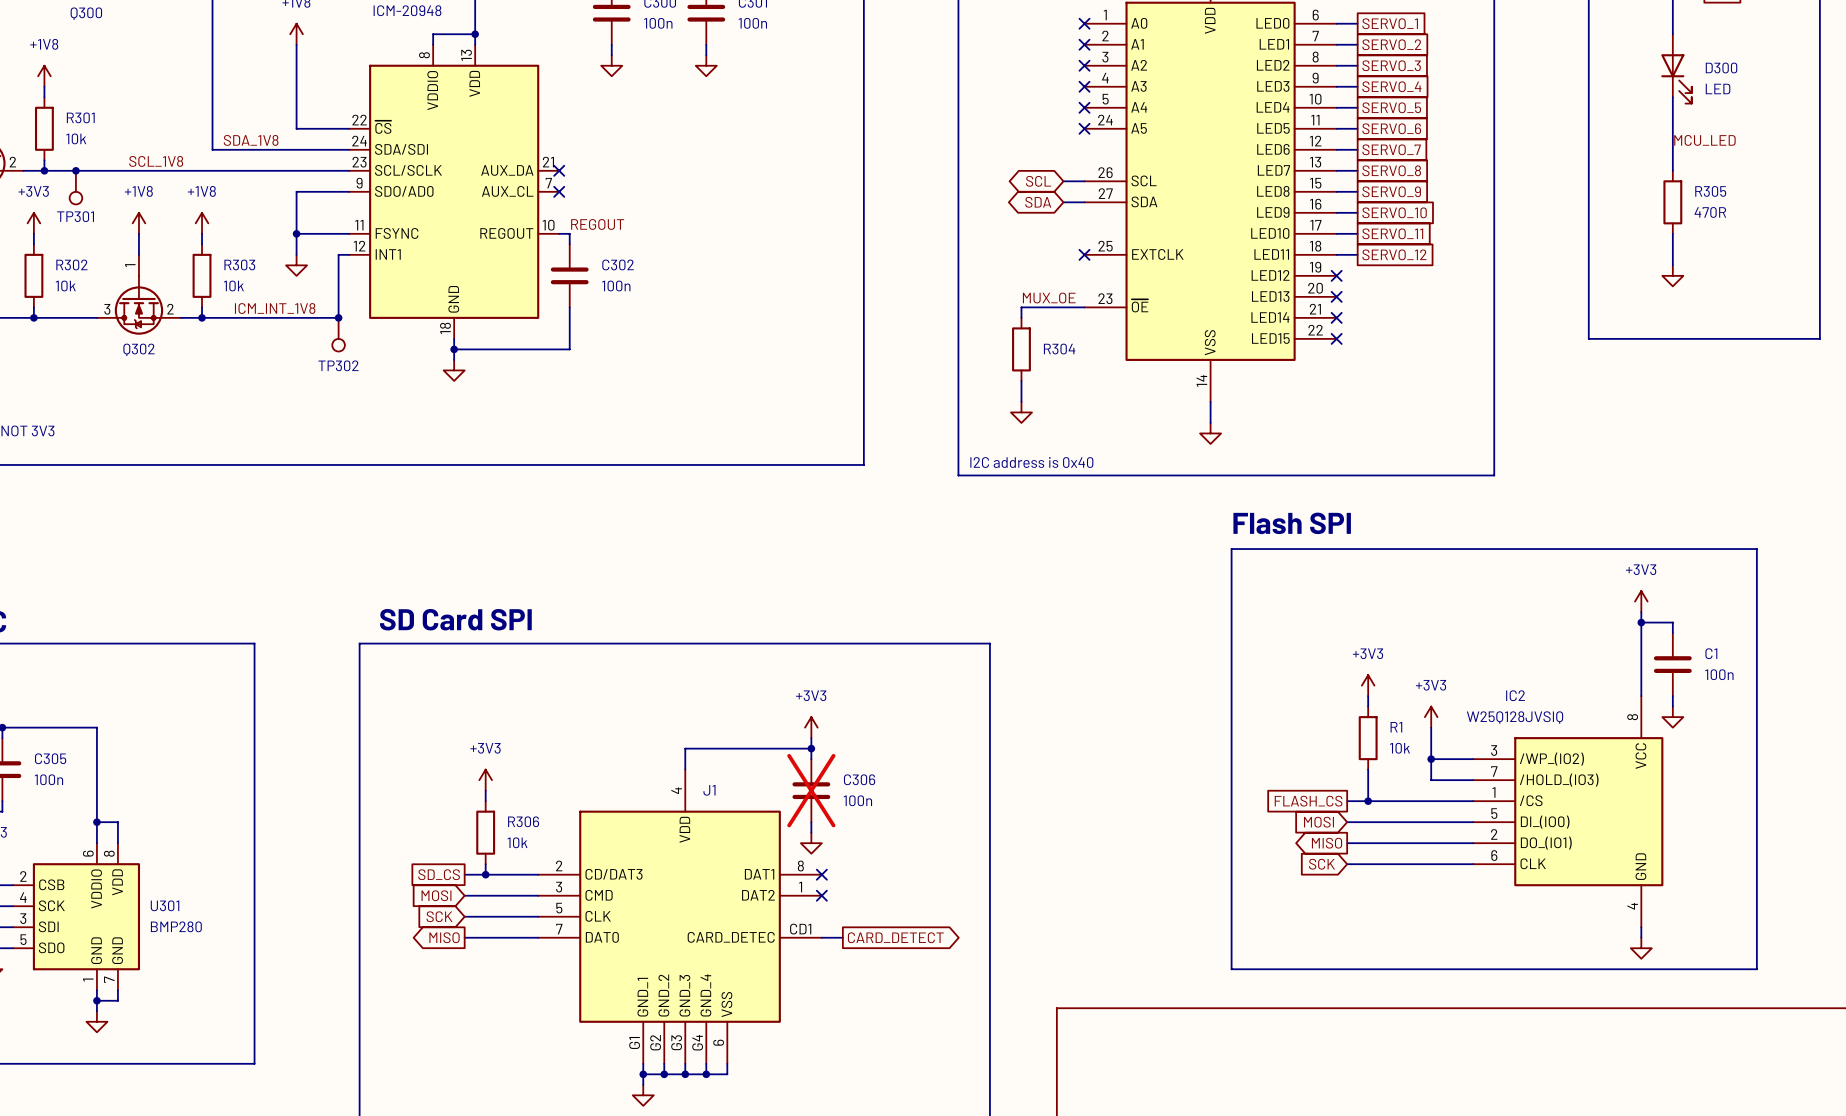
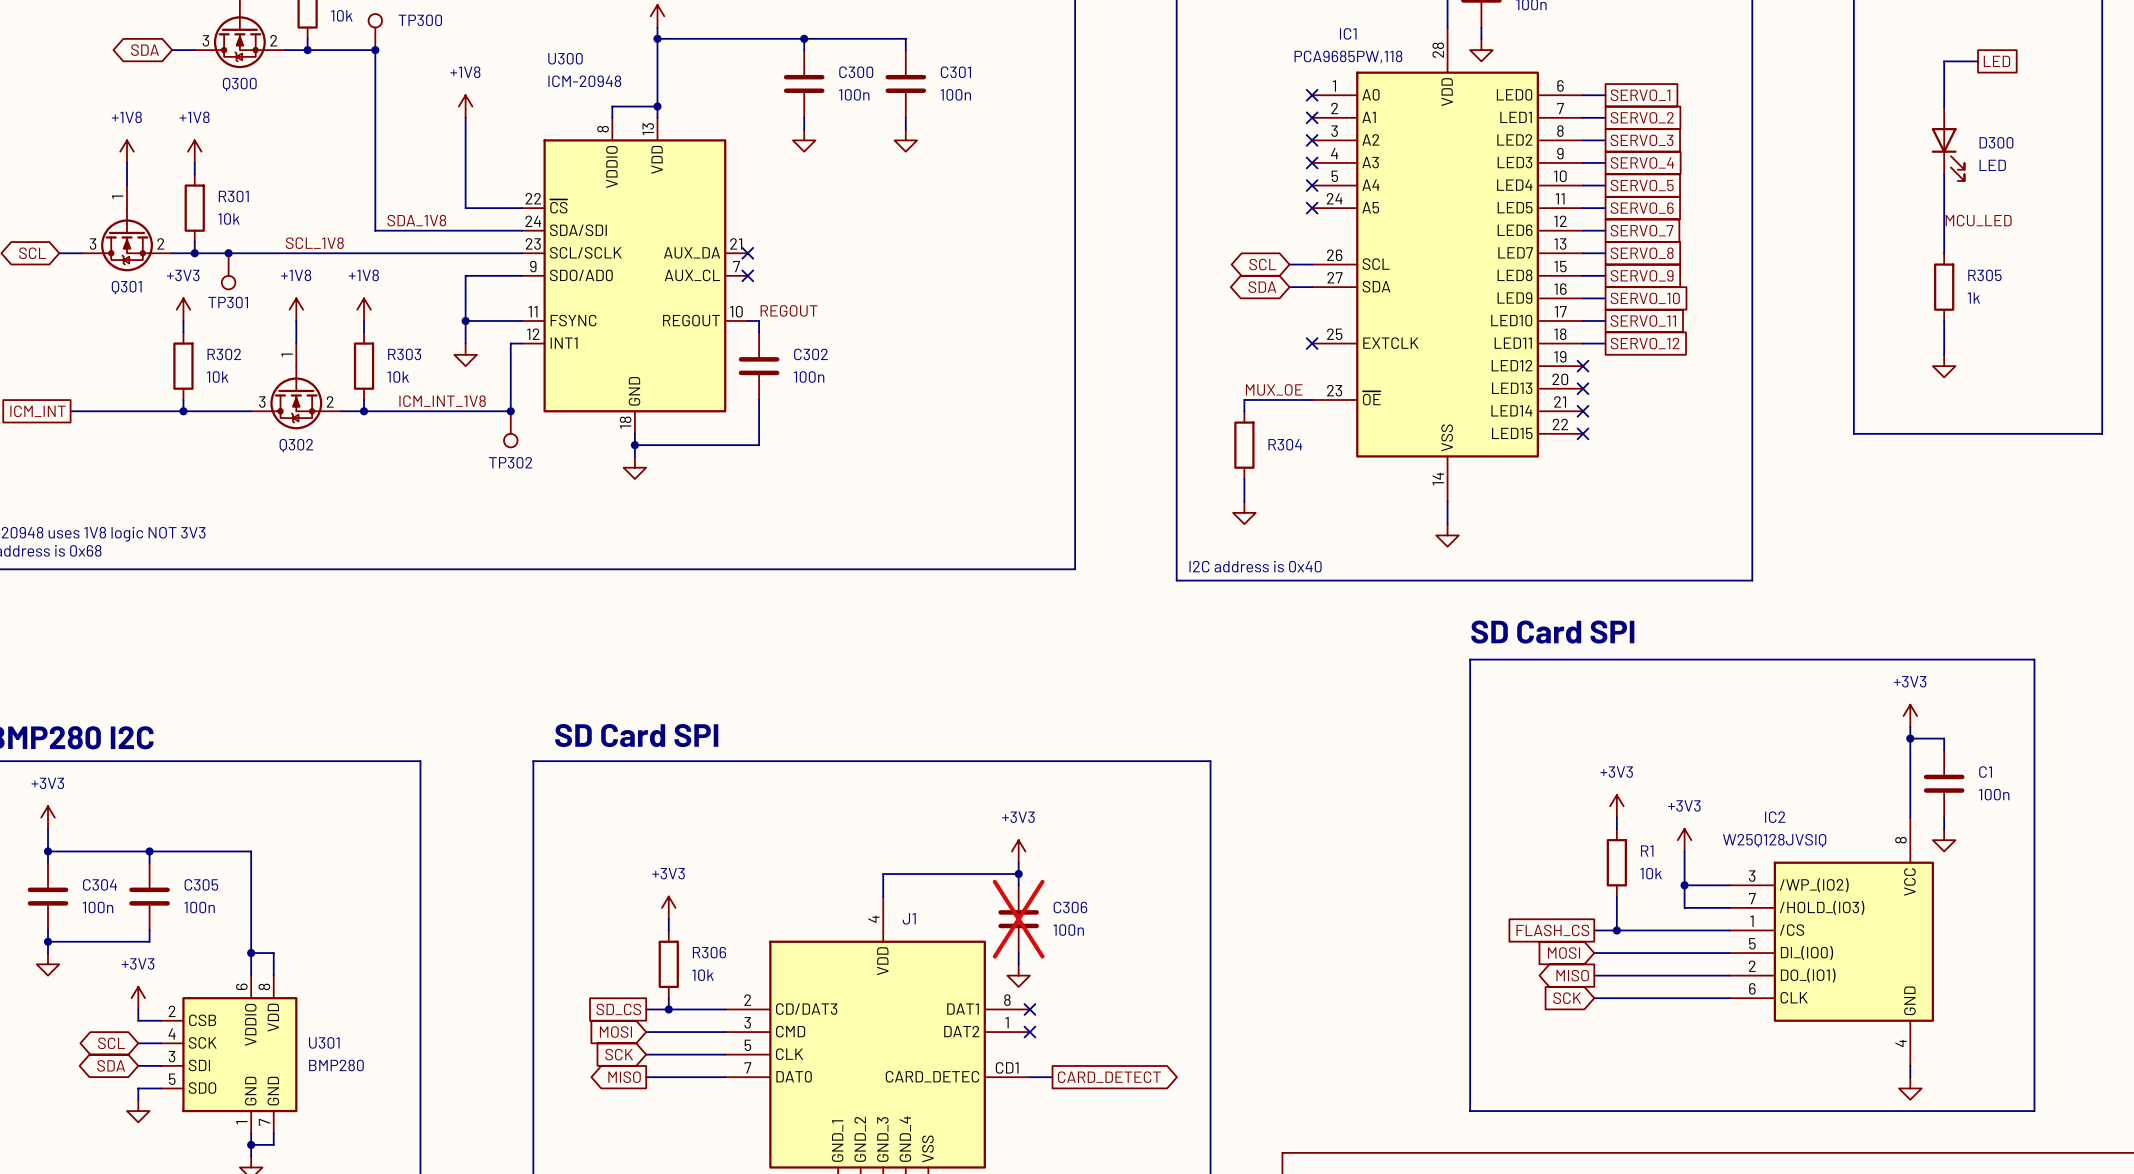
R305 value: 470R (1710, 212) -> 1k (1973, 297)
text: Flash SPI (1292, 523) -> SD Card SPI (1552, 632)

